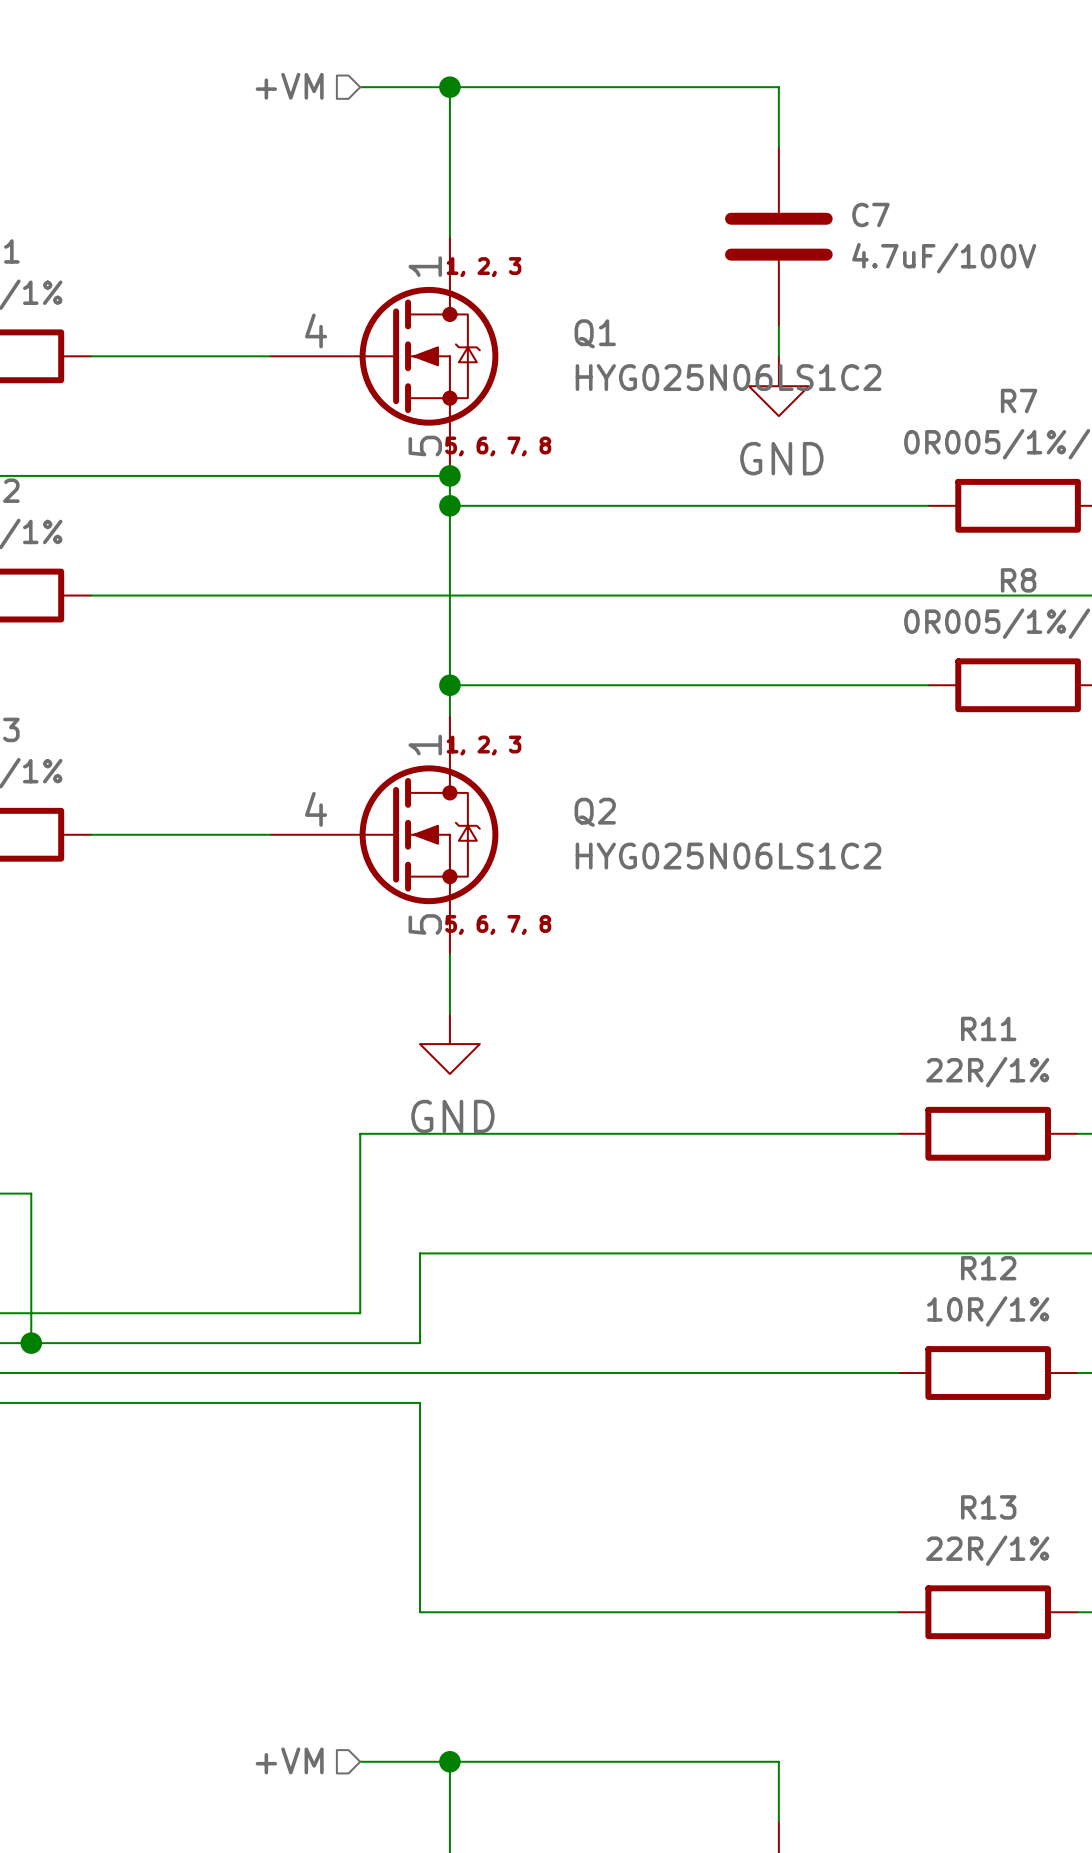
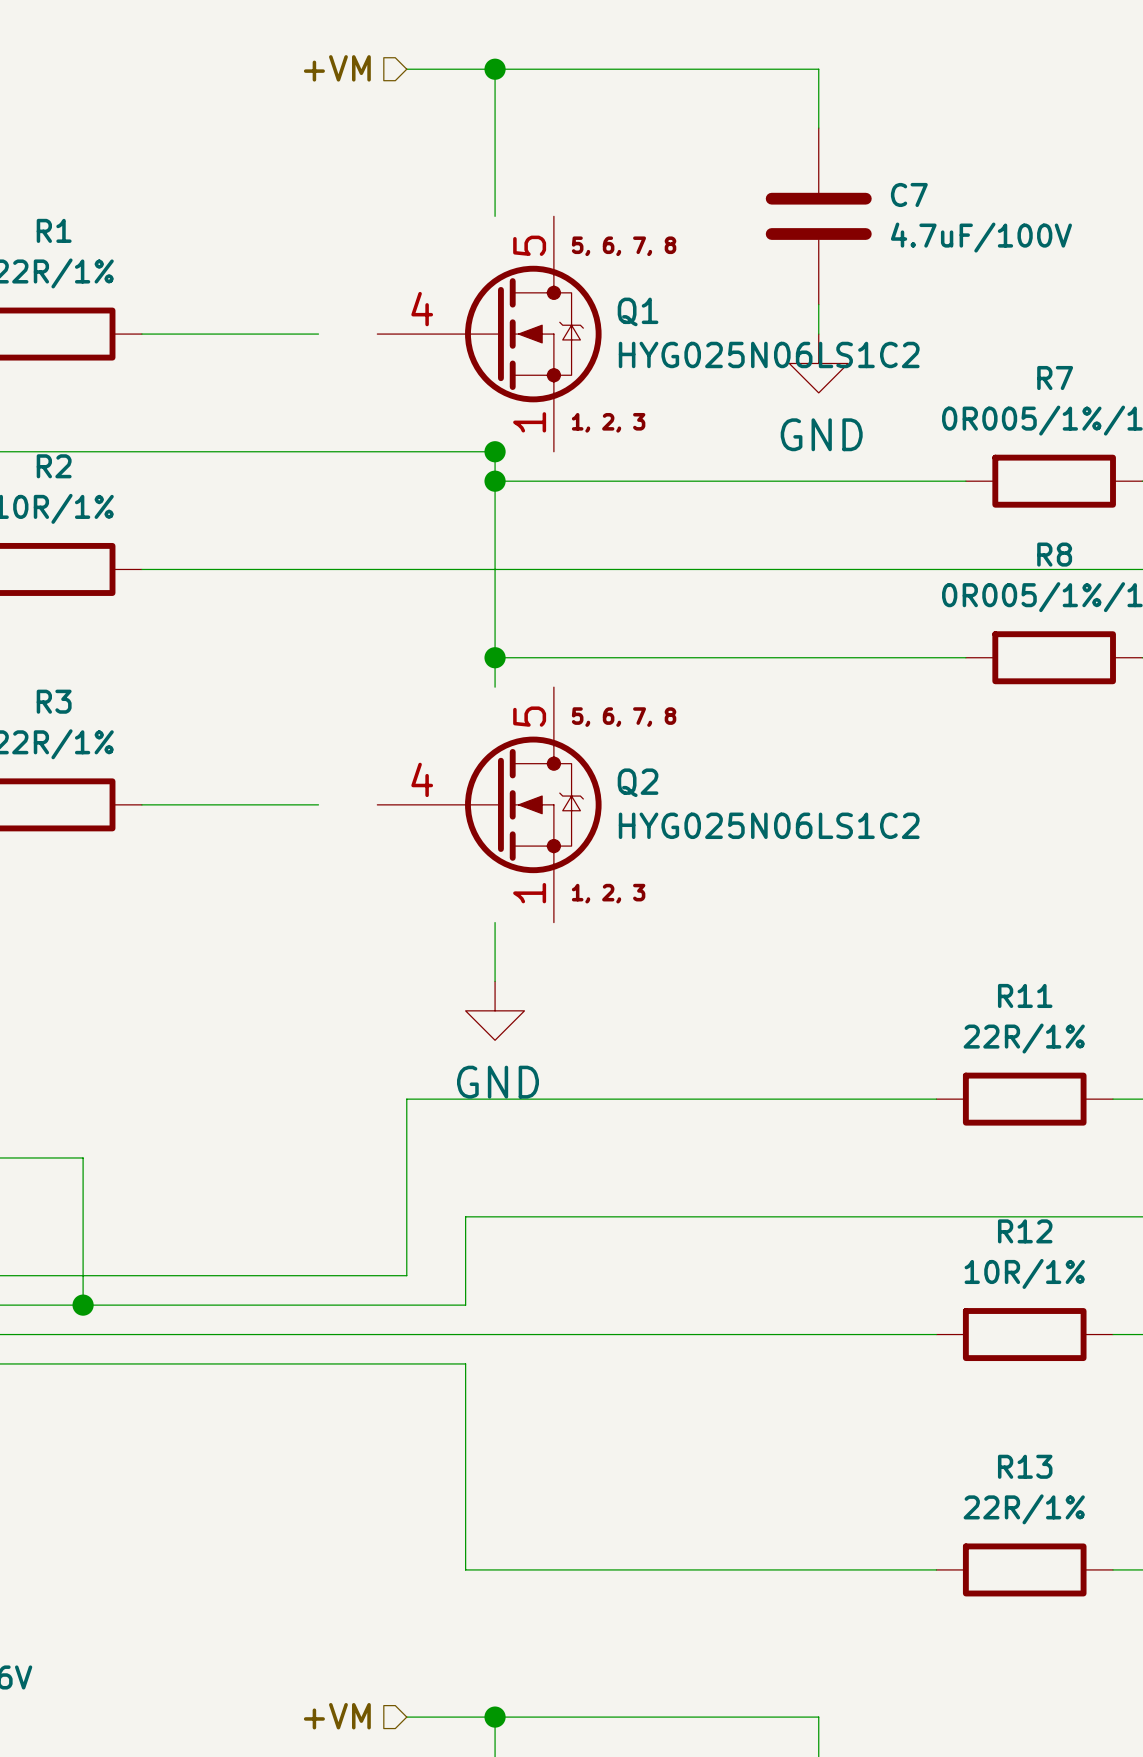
Q1 pin number: 1 (425, 266) -> 5 (529, 245)
Q1 text position: 1, 2, 3 (484, 267) -> 1, 2, 3 (608, 422)
Q1 position: (384, 356) -> (489, 334)
Q1 pin number: 5 (425, 446) -> 1 (529, 422)
Q1 text position: 5, 6, 7, 8 (498, 446) -> 5, 6, 7, 8 (624, 246)
Q2 pin number: 1 (425, 745) -> 5 (529, 716)
Q2 text position: 1, 2, 3 (484, 745) -> 1, 2, 3 (608, 893)
Q2 position: (384, 834) -> (489, 804)
Q2 pin number: 5 (425, 924) -> 1 (529, 893)
Q2 text position: 5, 6, 7, 8 (498, 924) -> 5, 6, 7, 8 (624, 717)

